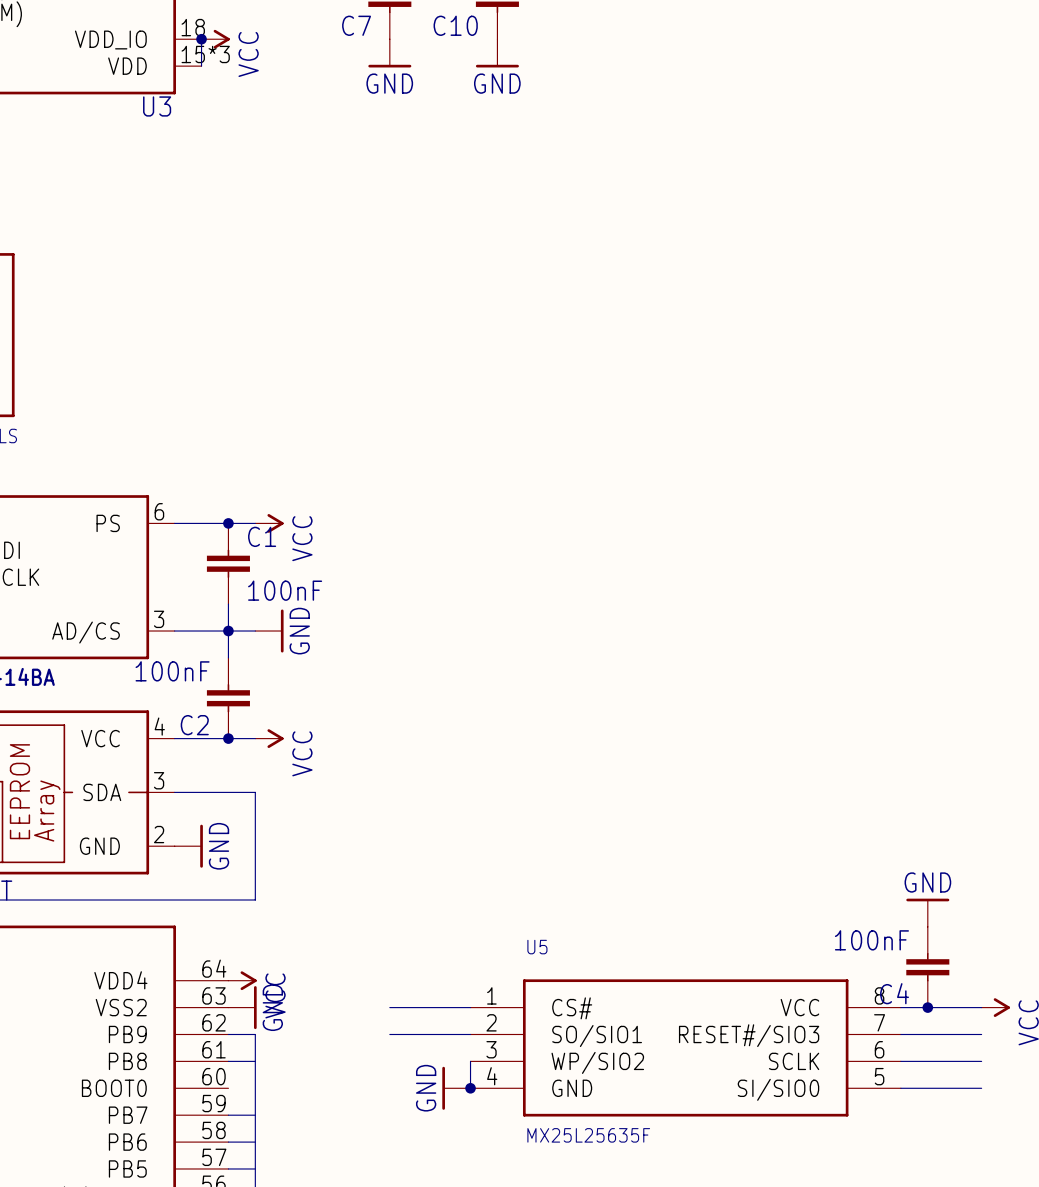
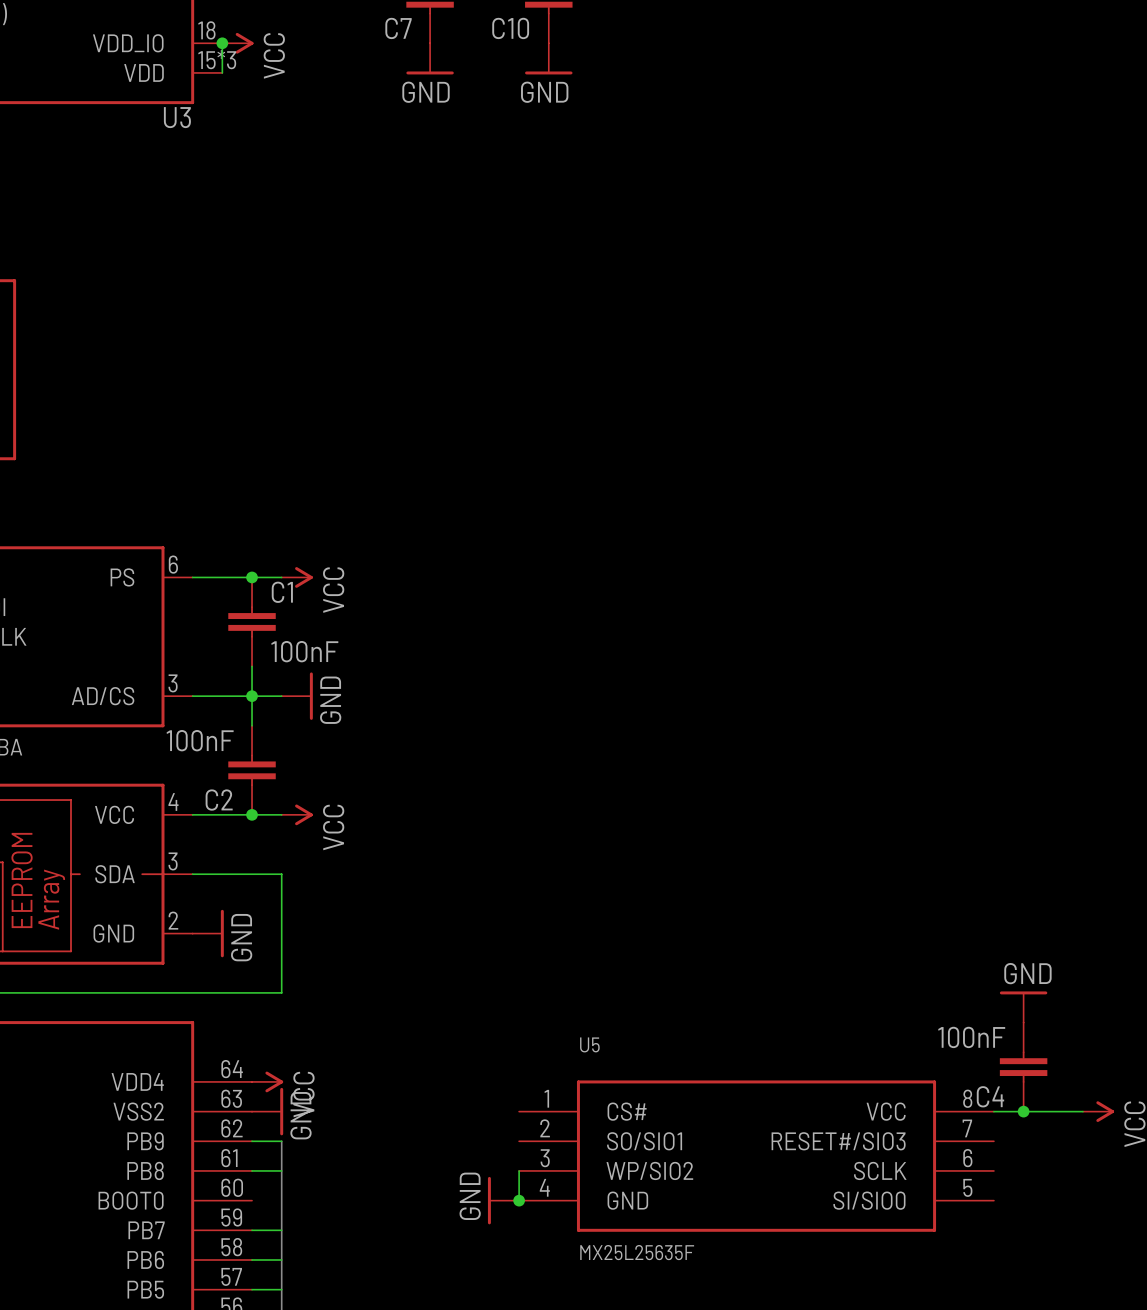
wire: (389, 1007) (470, 1007) -> none
wire: (389, 1034) (470, 1034) -> none
wire: (900, 1034) (981, 1034) -> none
wire: (900, 1061) (981, 1061) -> none
wire: (900, 1088) (981, 1088) -> none

